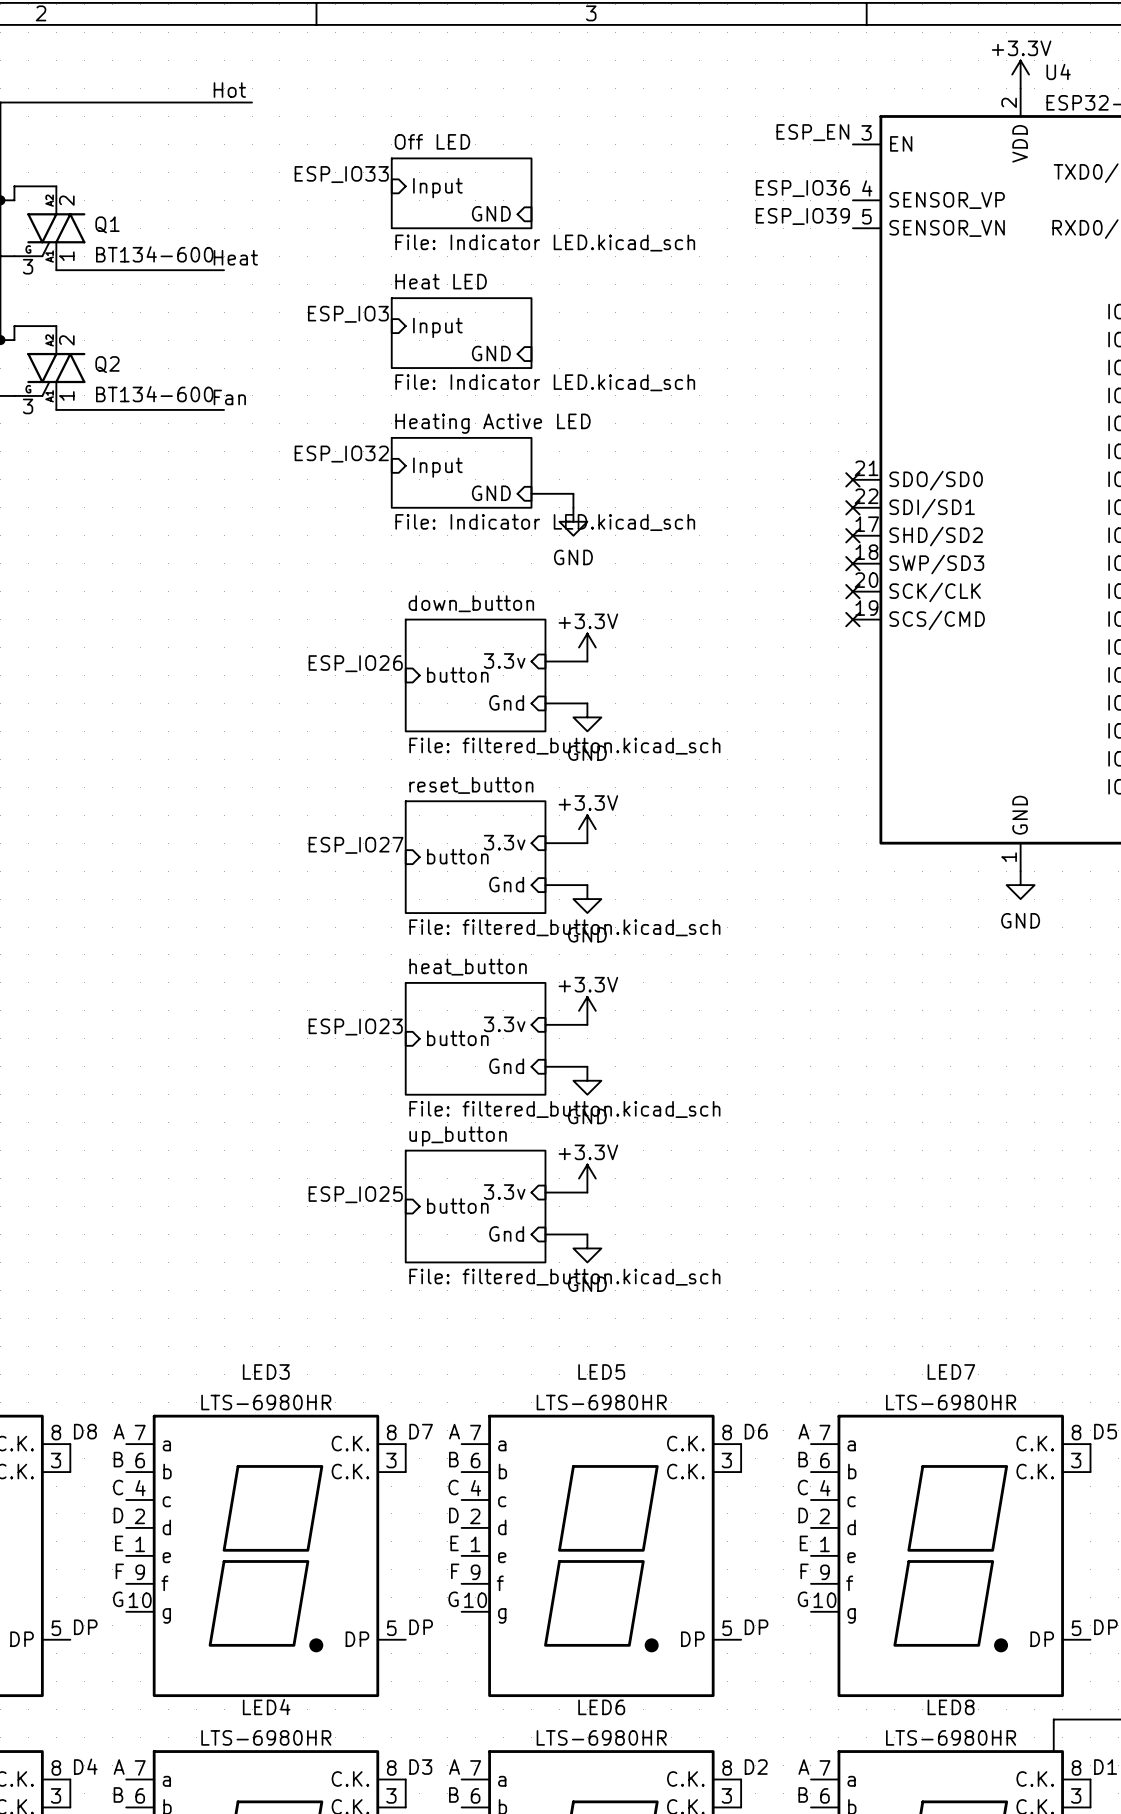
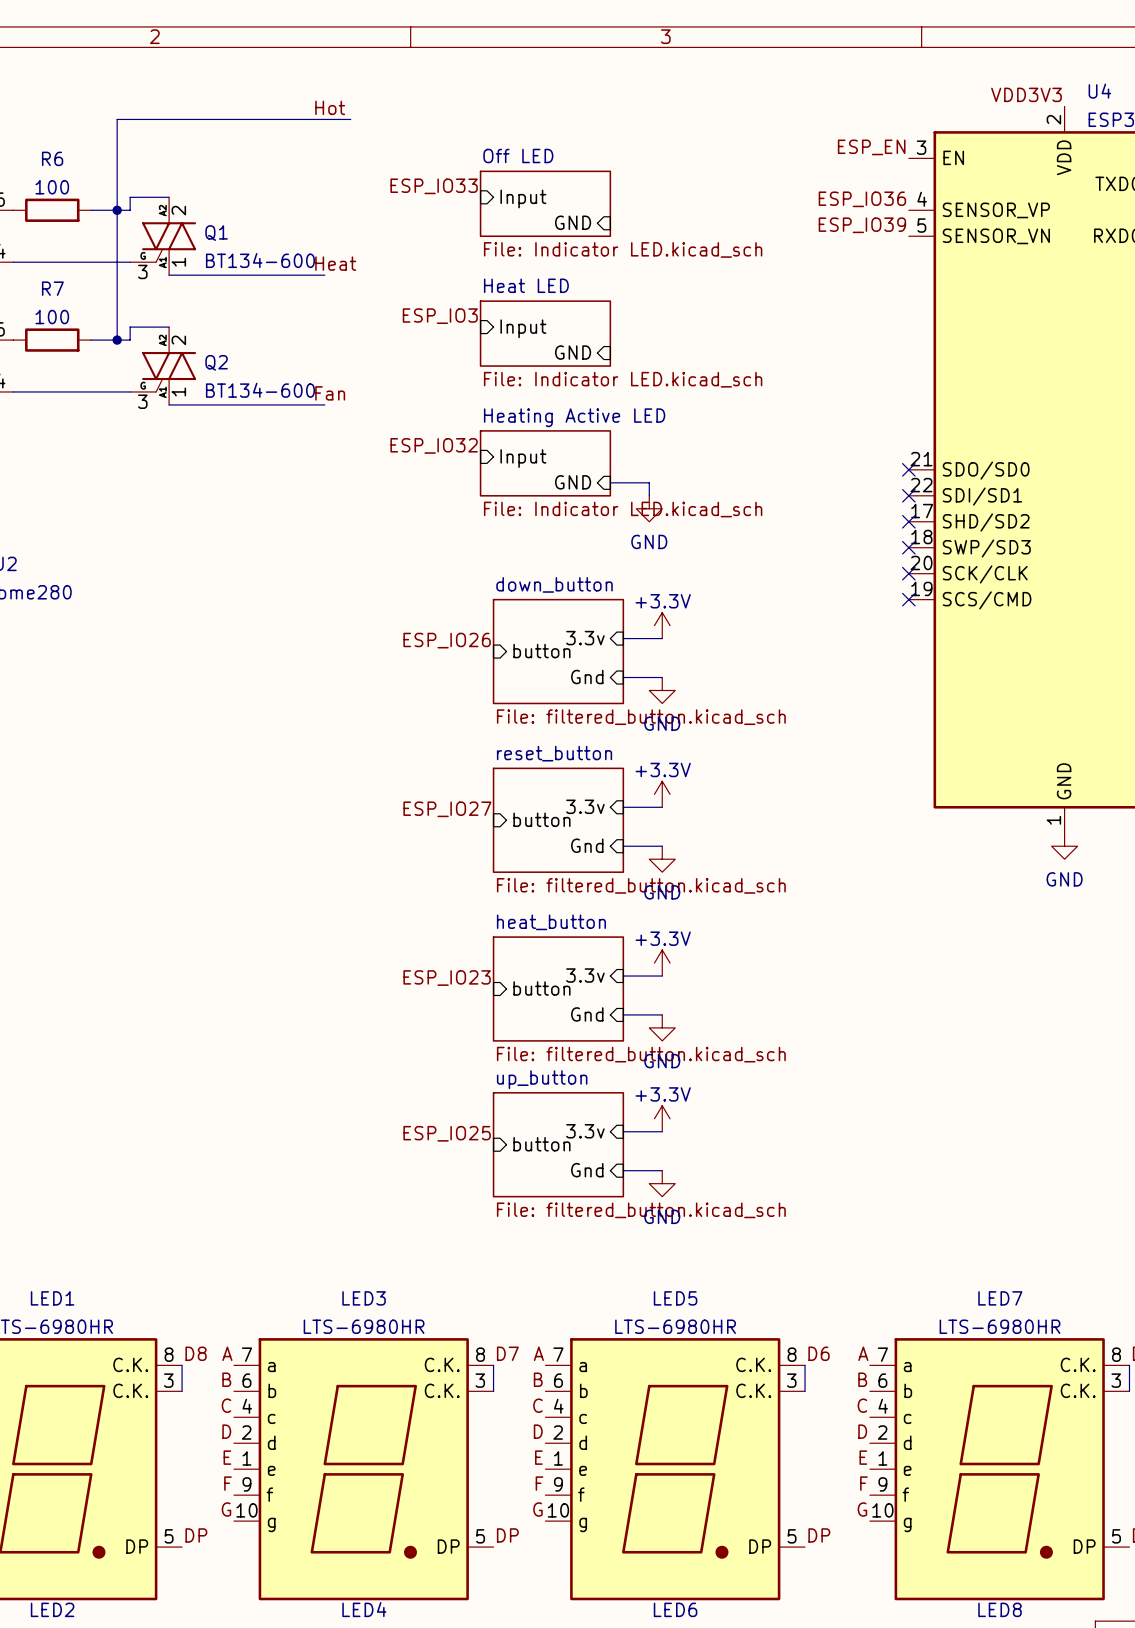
power symbol: +3.3V (1020, 74) -> none
label: none -> VDD3V3 (1026, 94)

